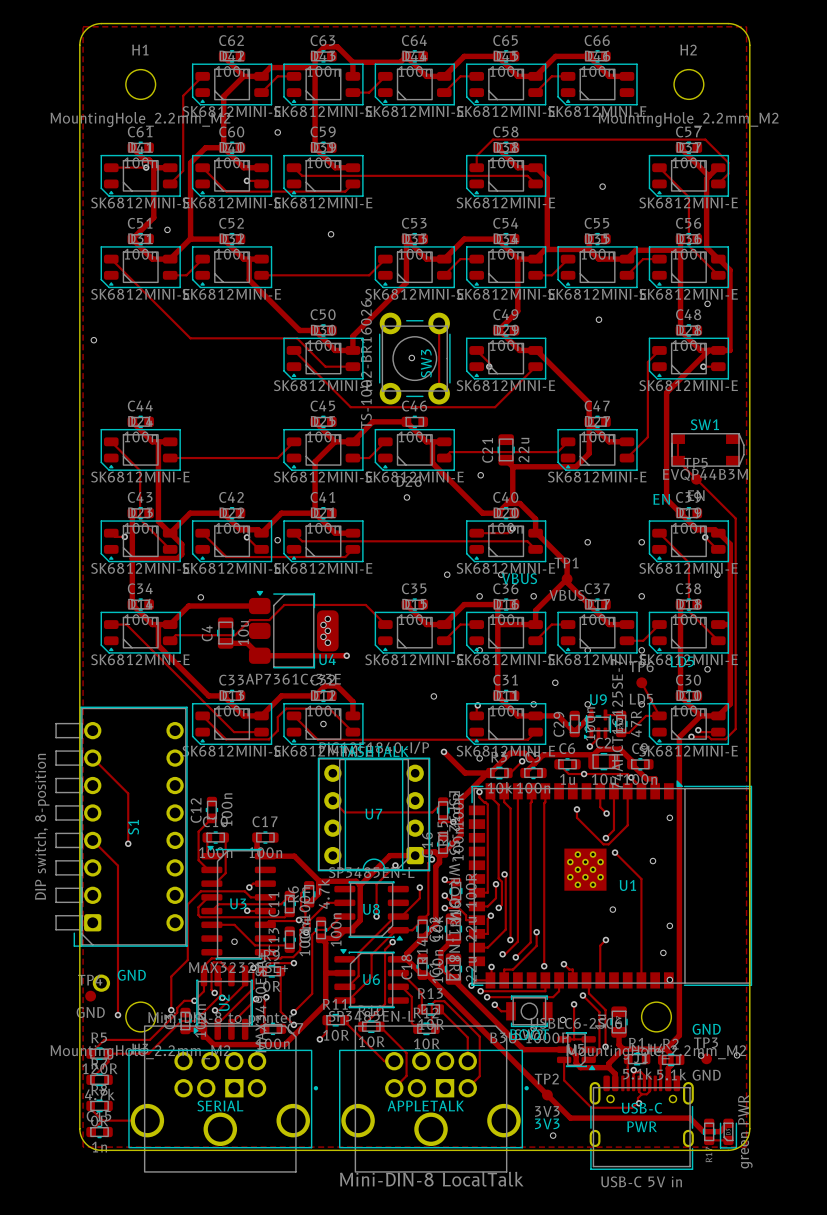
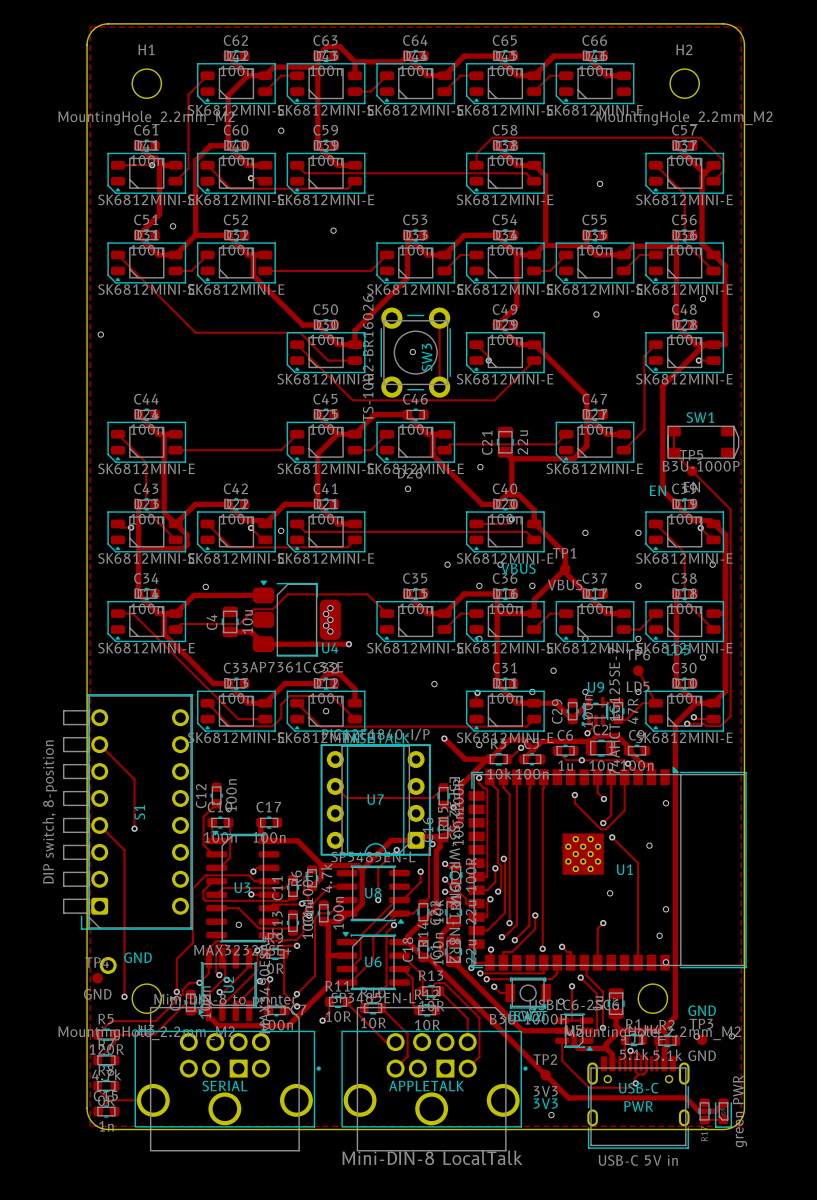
SW1 value: EVQP44B3M (705, 474) -> B3U-1000P (701, 466)

